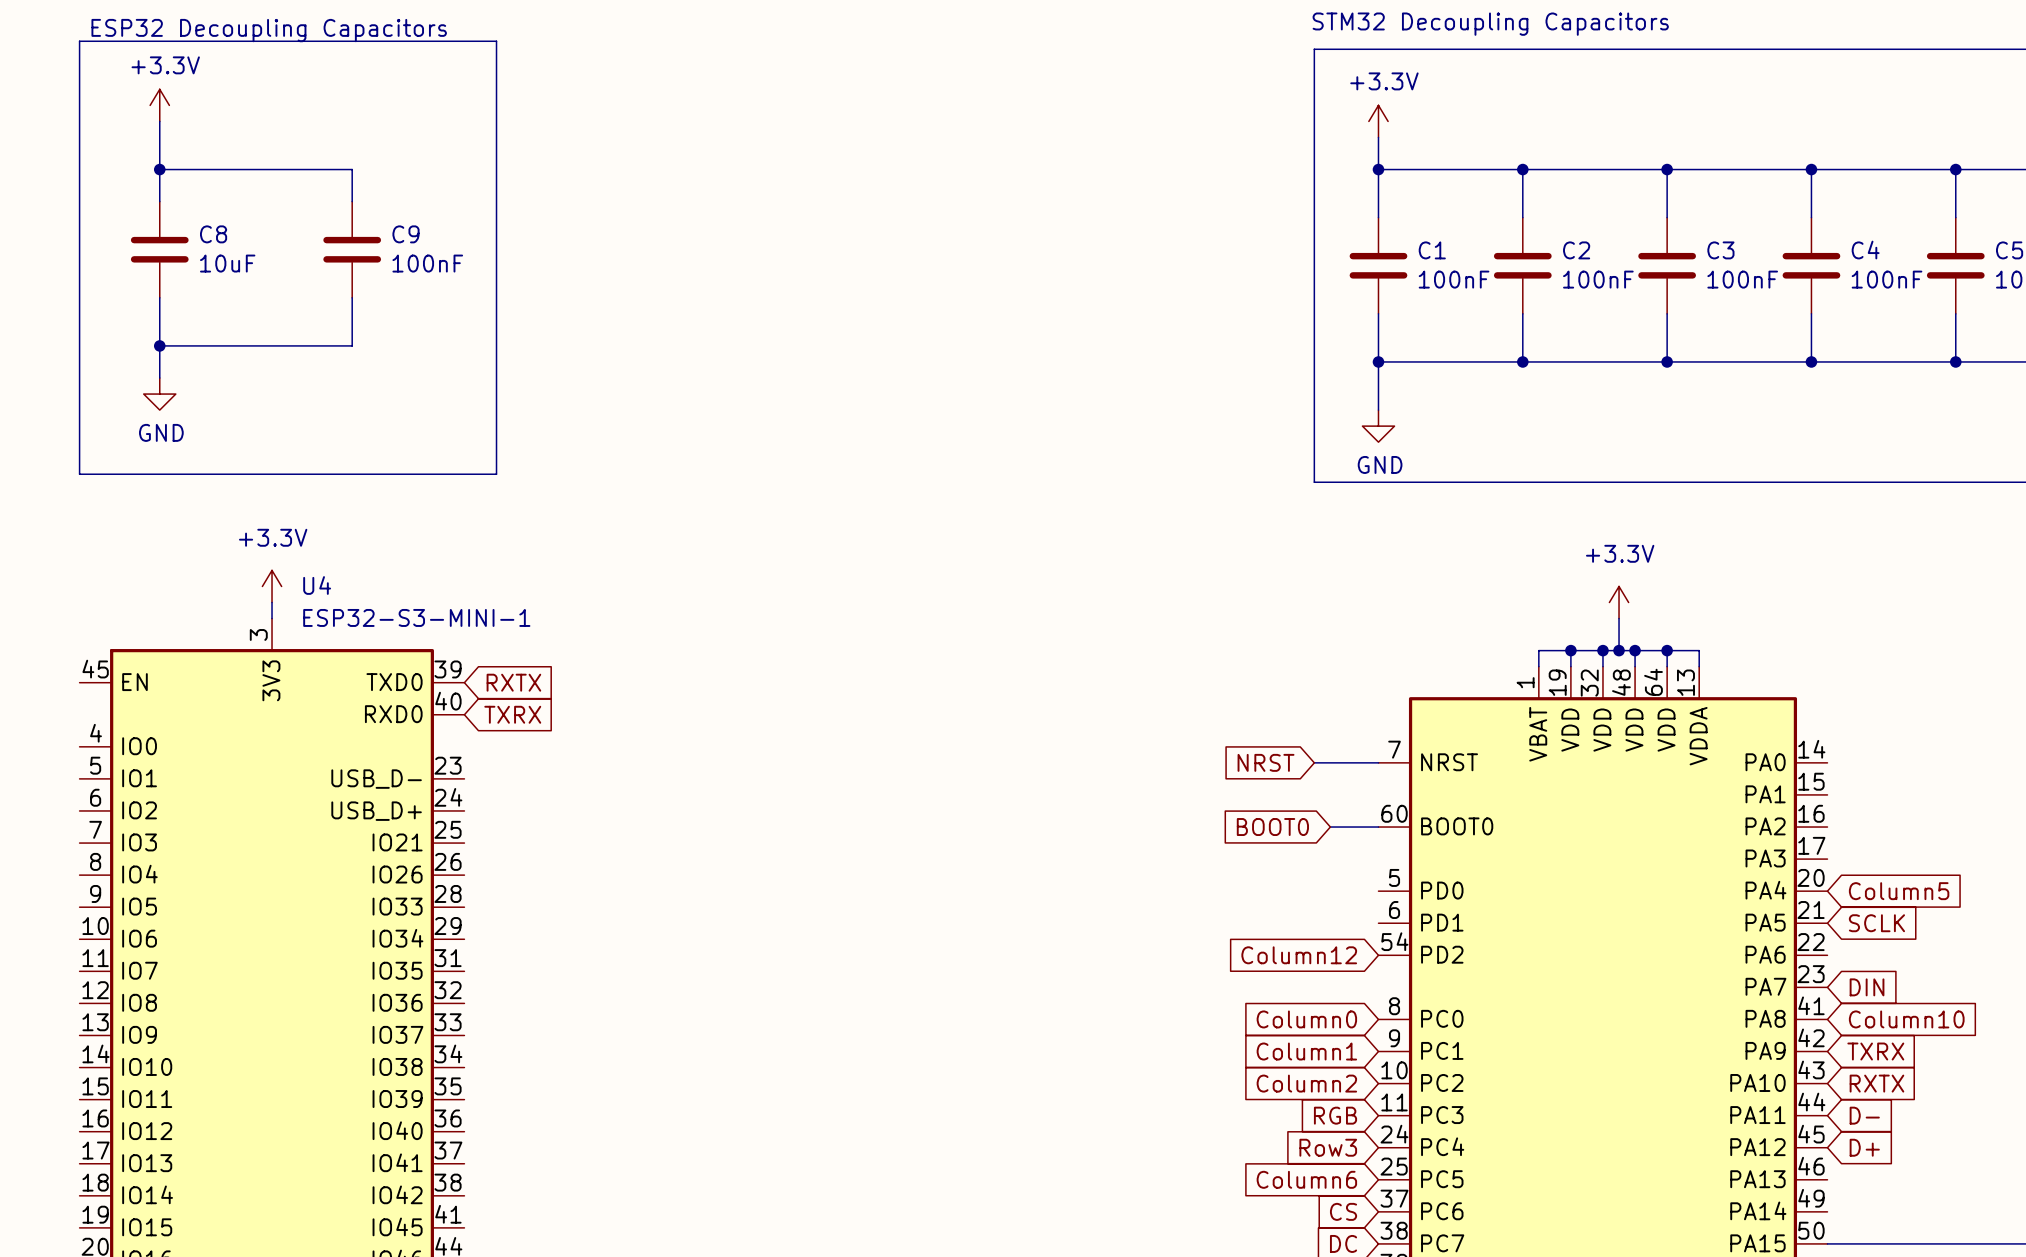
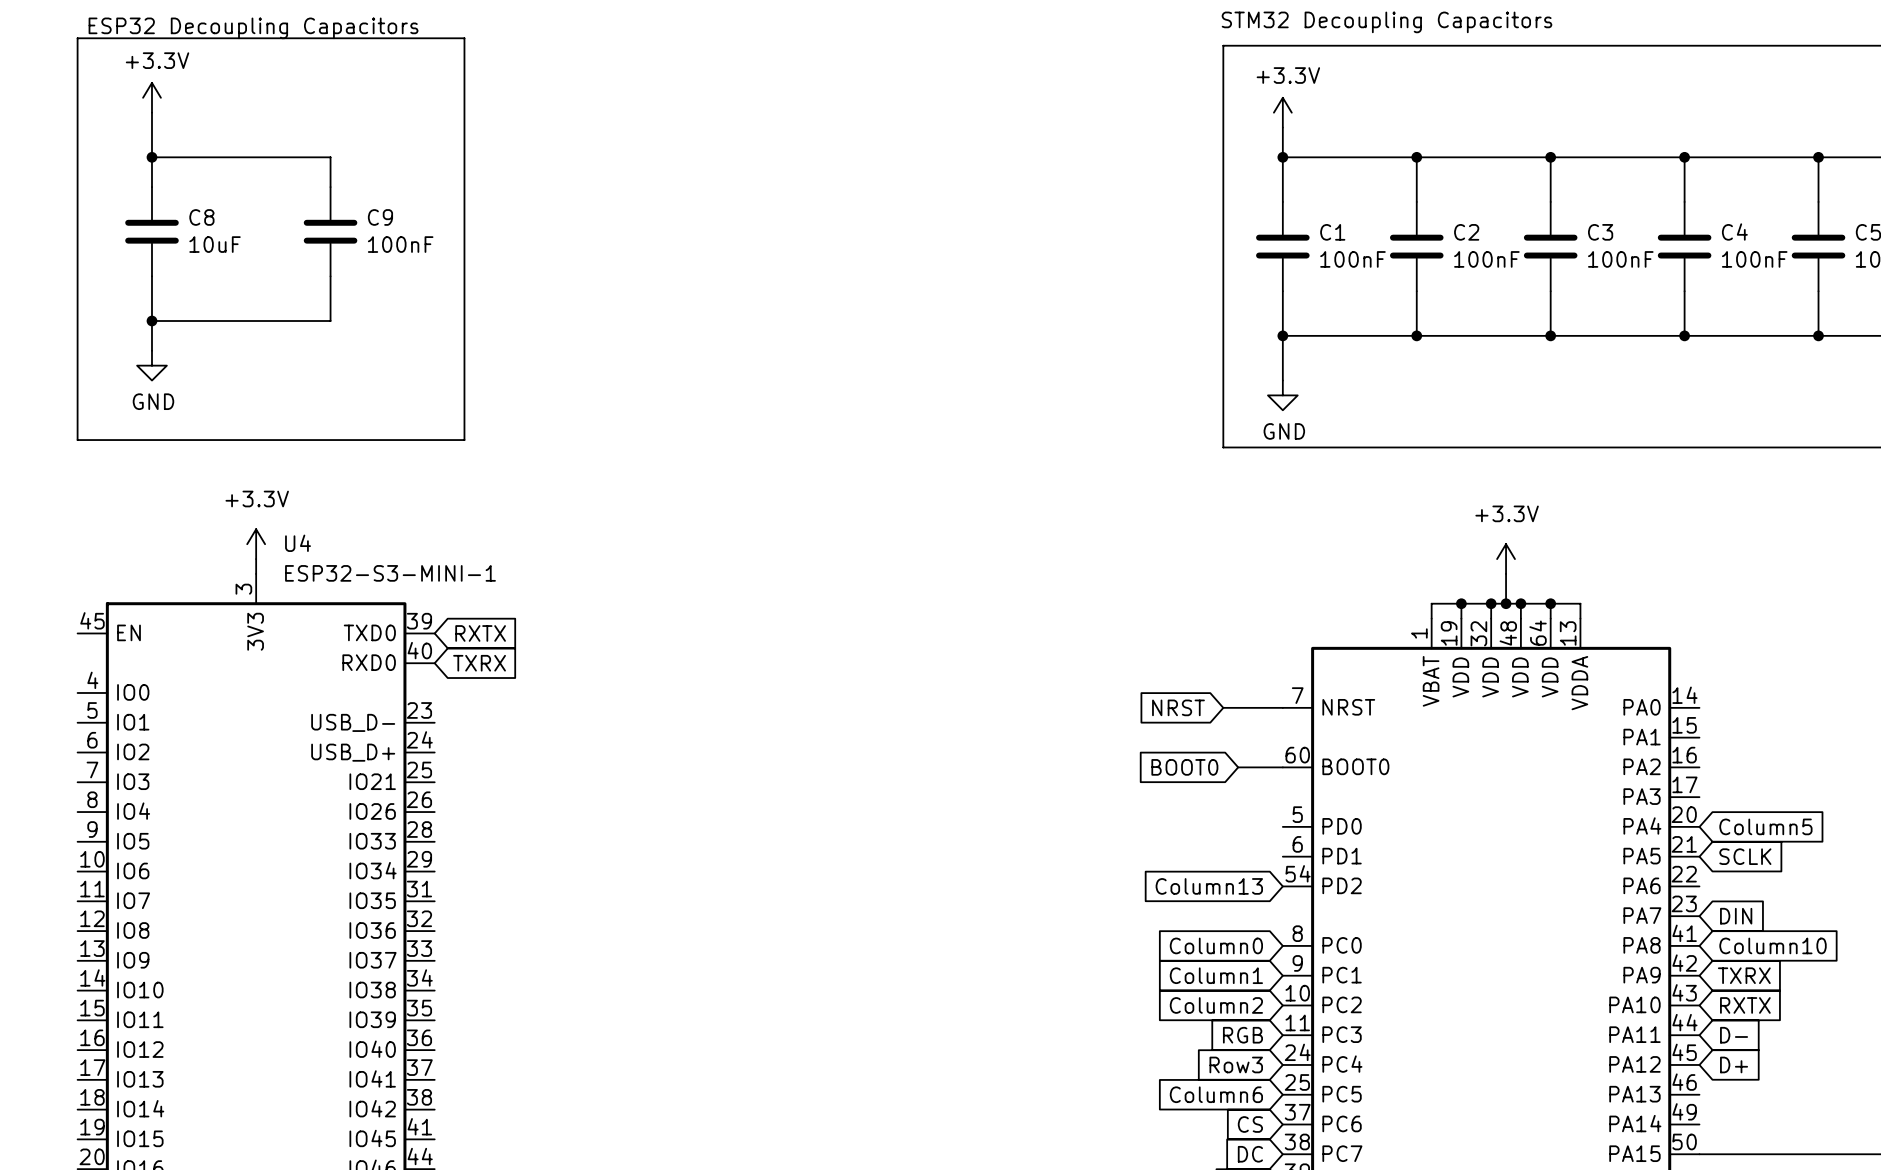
global label: Column12 (1299, 955) -> Column13 (1209, 886)

